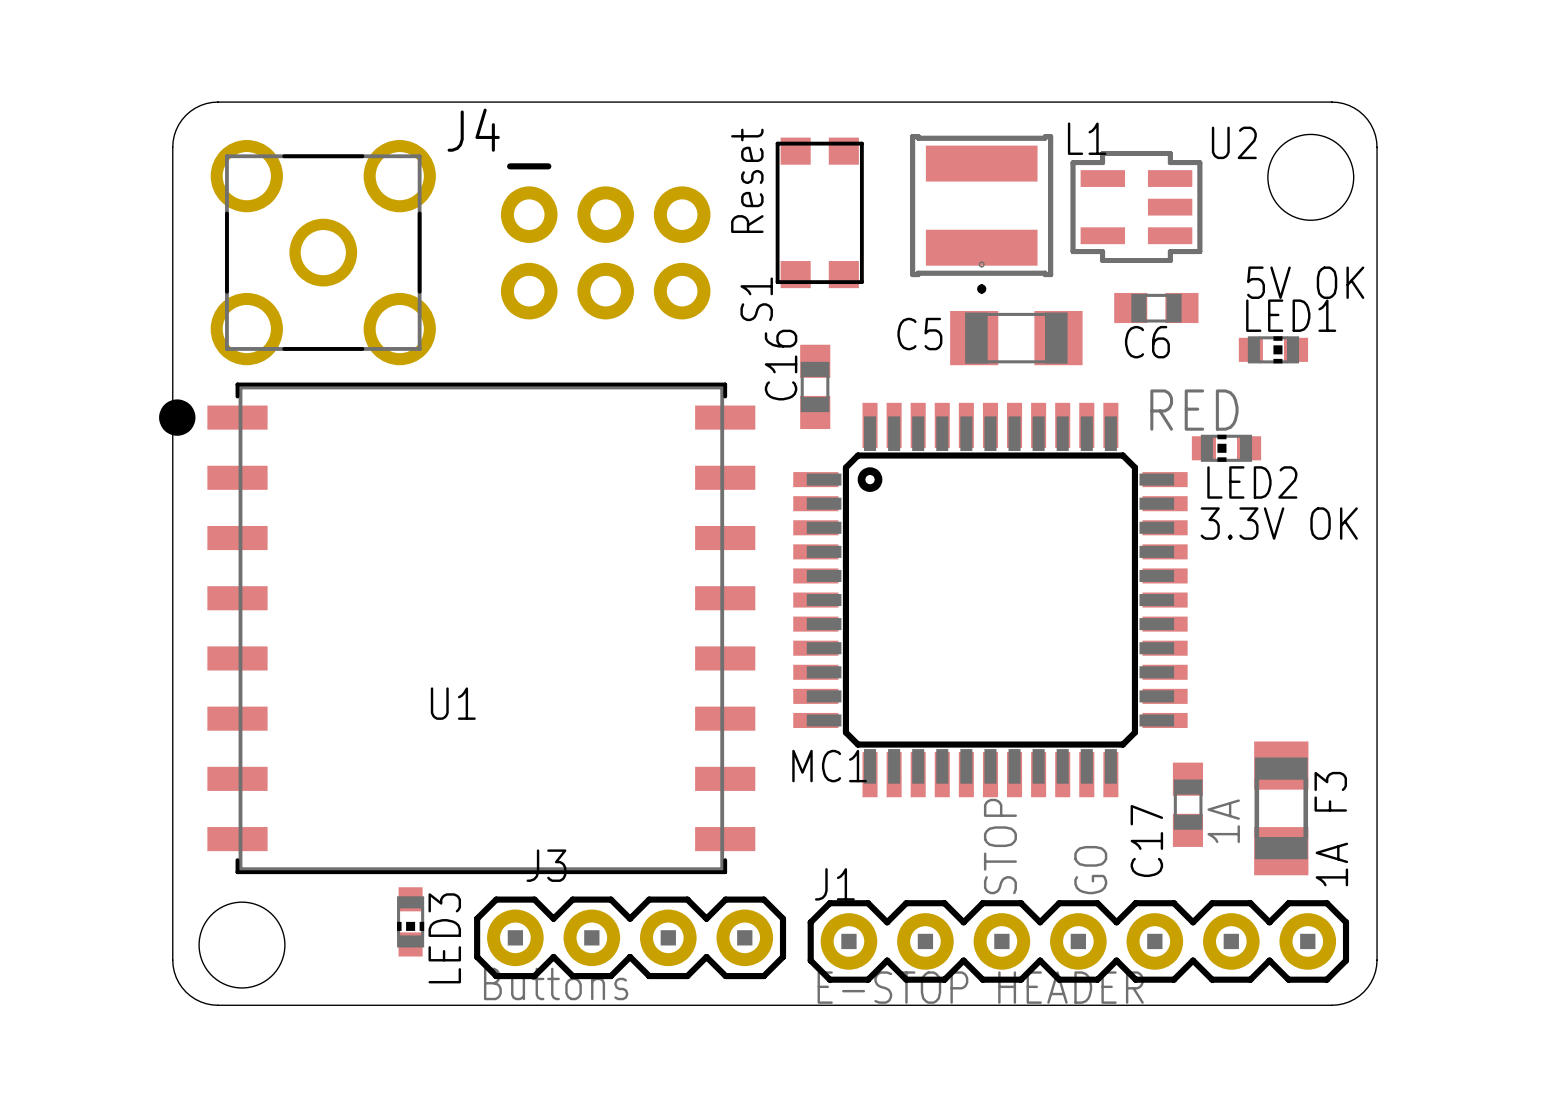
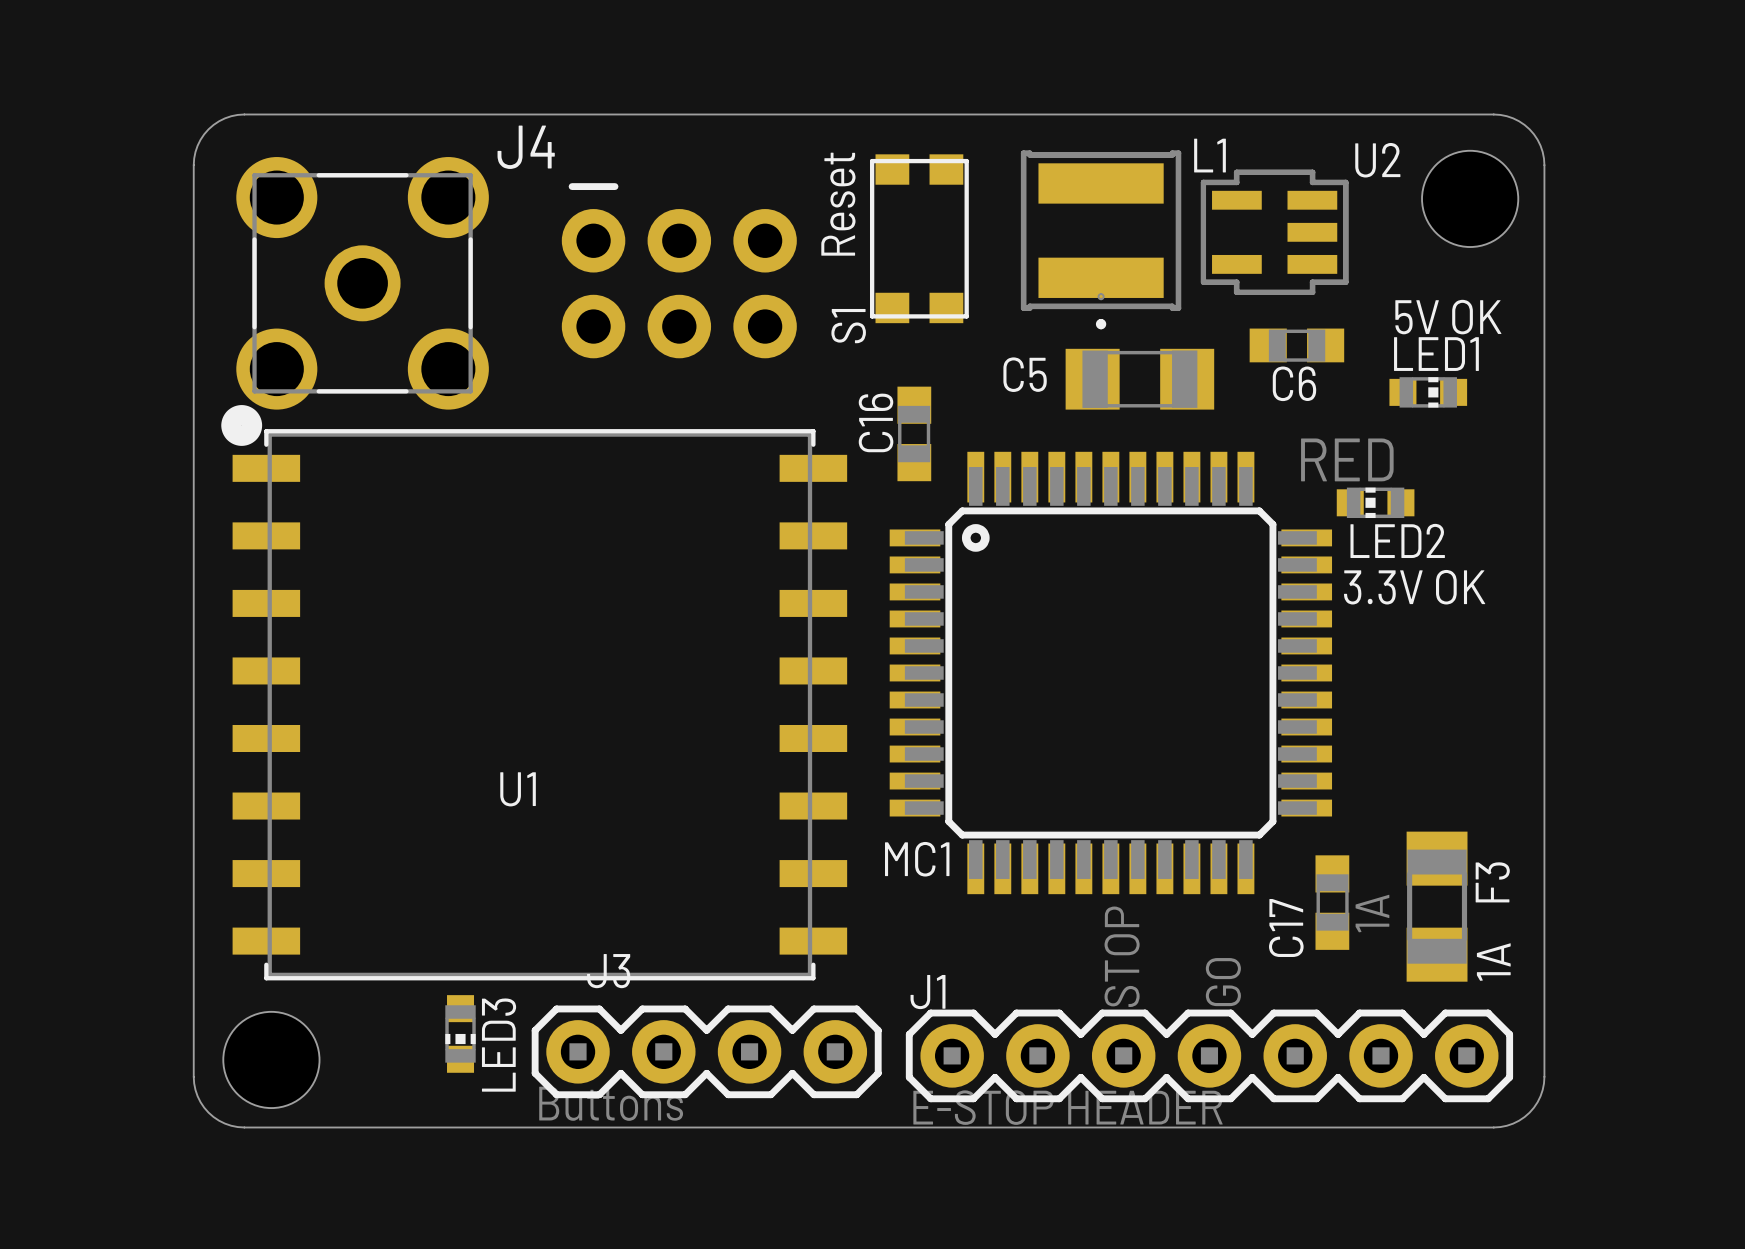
U1 footprint: [159, 382, 756, 875] -> [221, 405, 848, 981]

